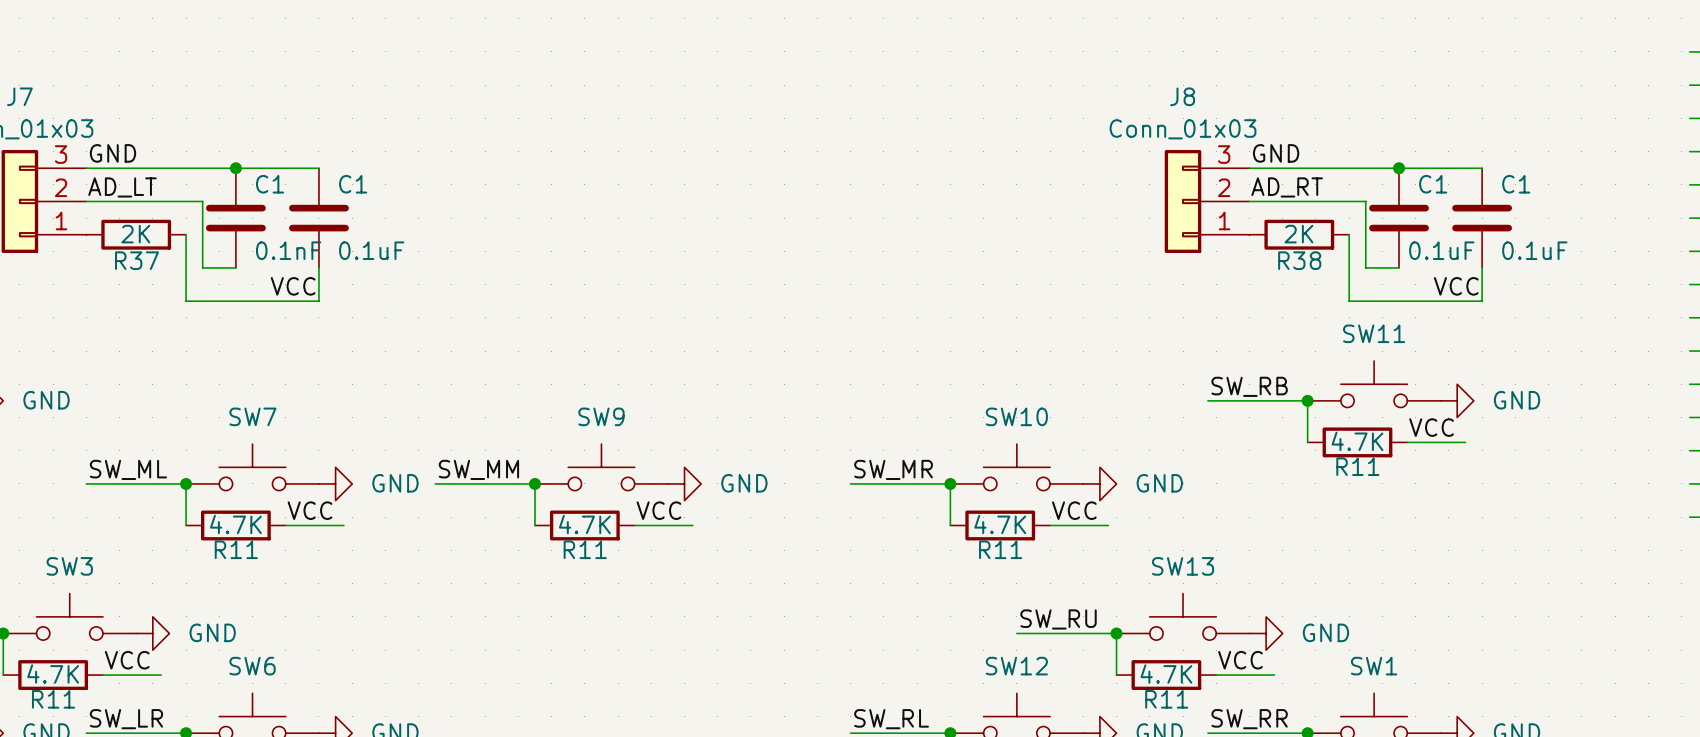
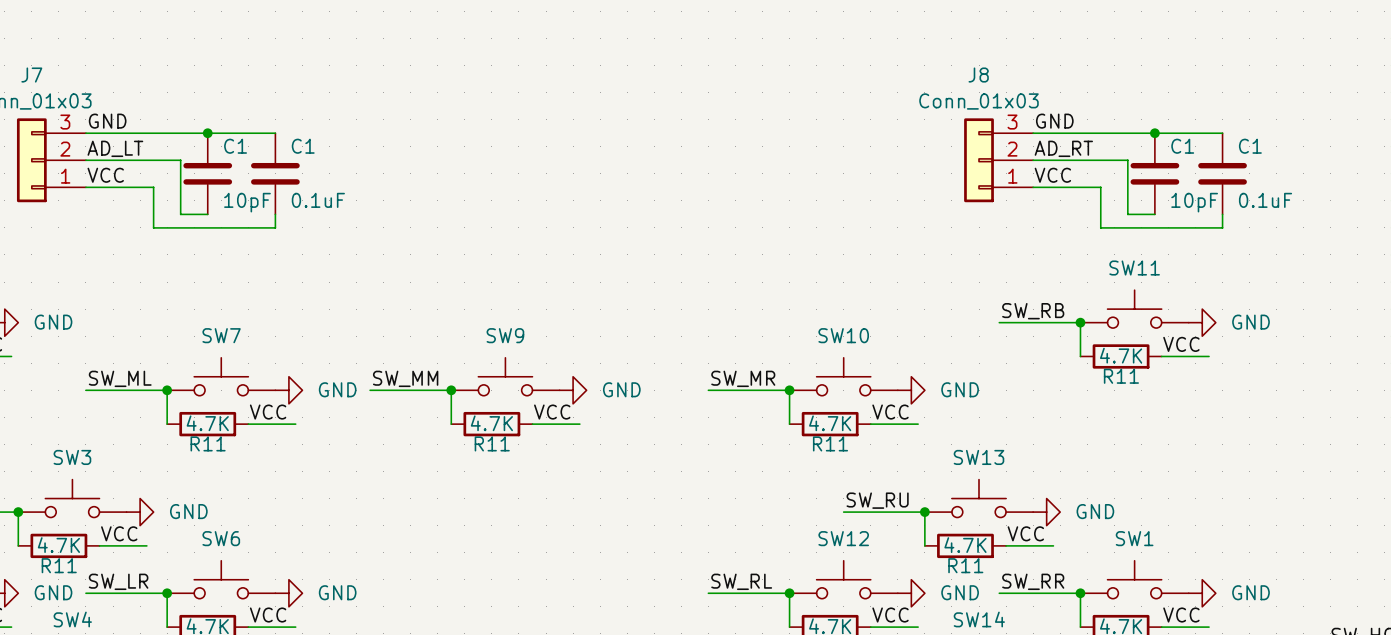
R37: 2K (136, 234) -> none
wire: (186, 234) (186, 301) (318, 301) (318, 284) -> (85, 187) (153, 187) (153, 227) (275, 227)
R38: 2K (1299, 234) -> none
wire: (1349, 234) (1349, 301) (1482, 301) (1482, 284) -> (1033, 187) (1100, 187) (1100, 227) (1222, 227)
C1 value: 0.1nF (288, 250) -> 10pF (247, 202)
C1 value: 0.1uF (1441, 250) -> 10pF (1194, 202)
label position: VCC (293, 286) -> VCC (105, 175)
label position: VCC (1456, 286) -> VCC (1052, 175)

